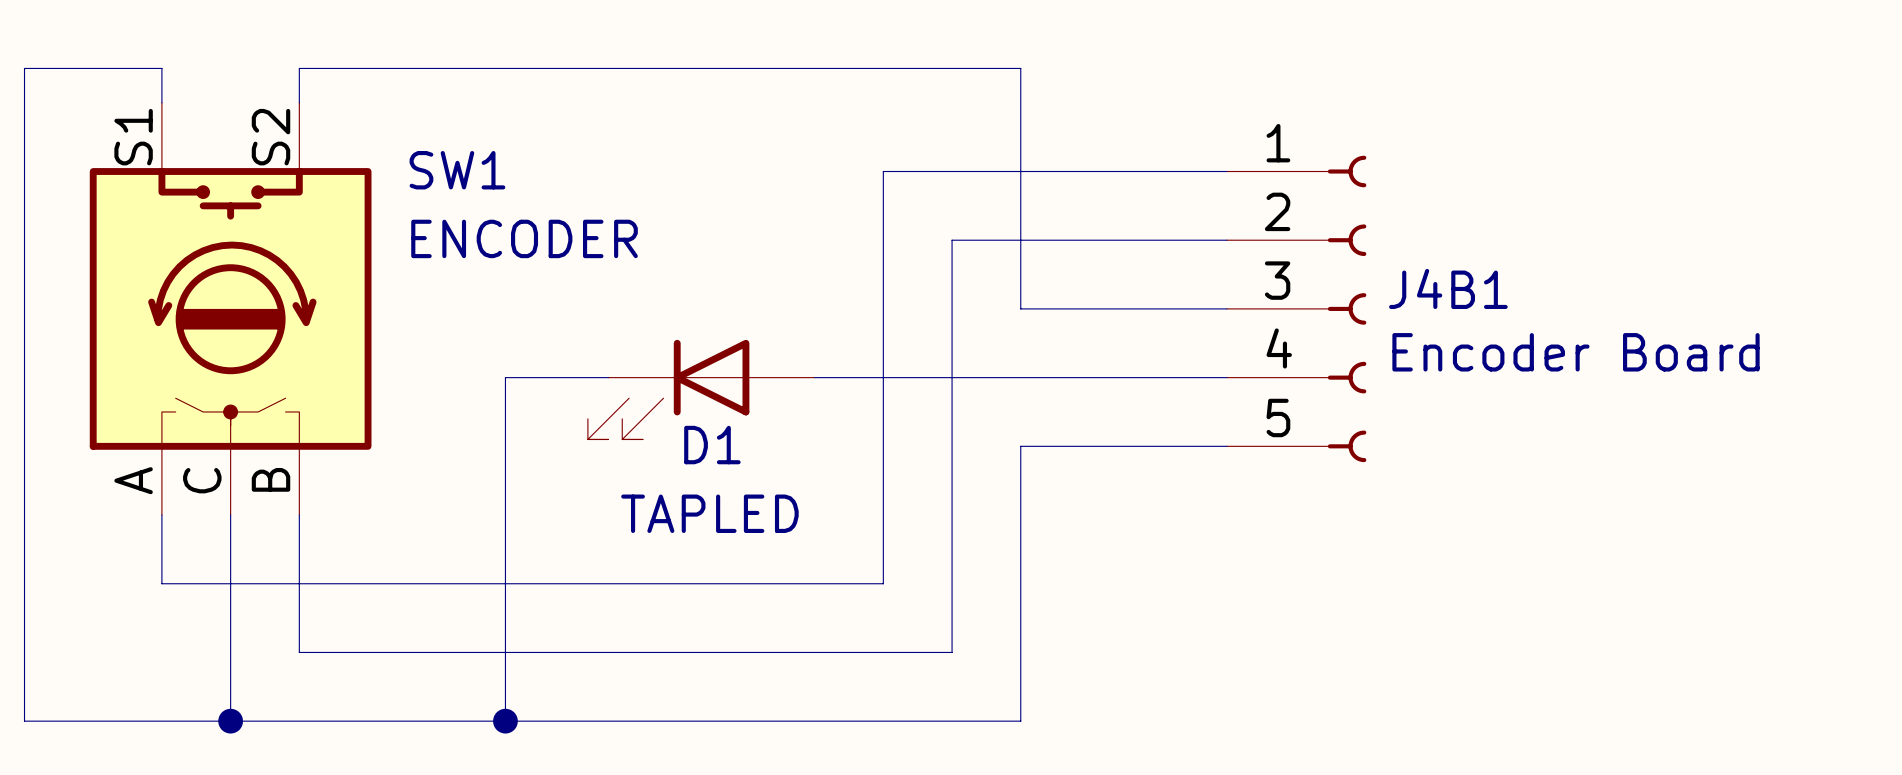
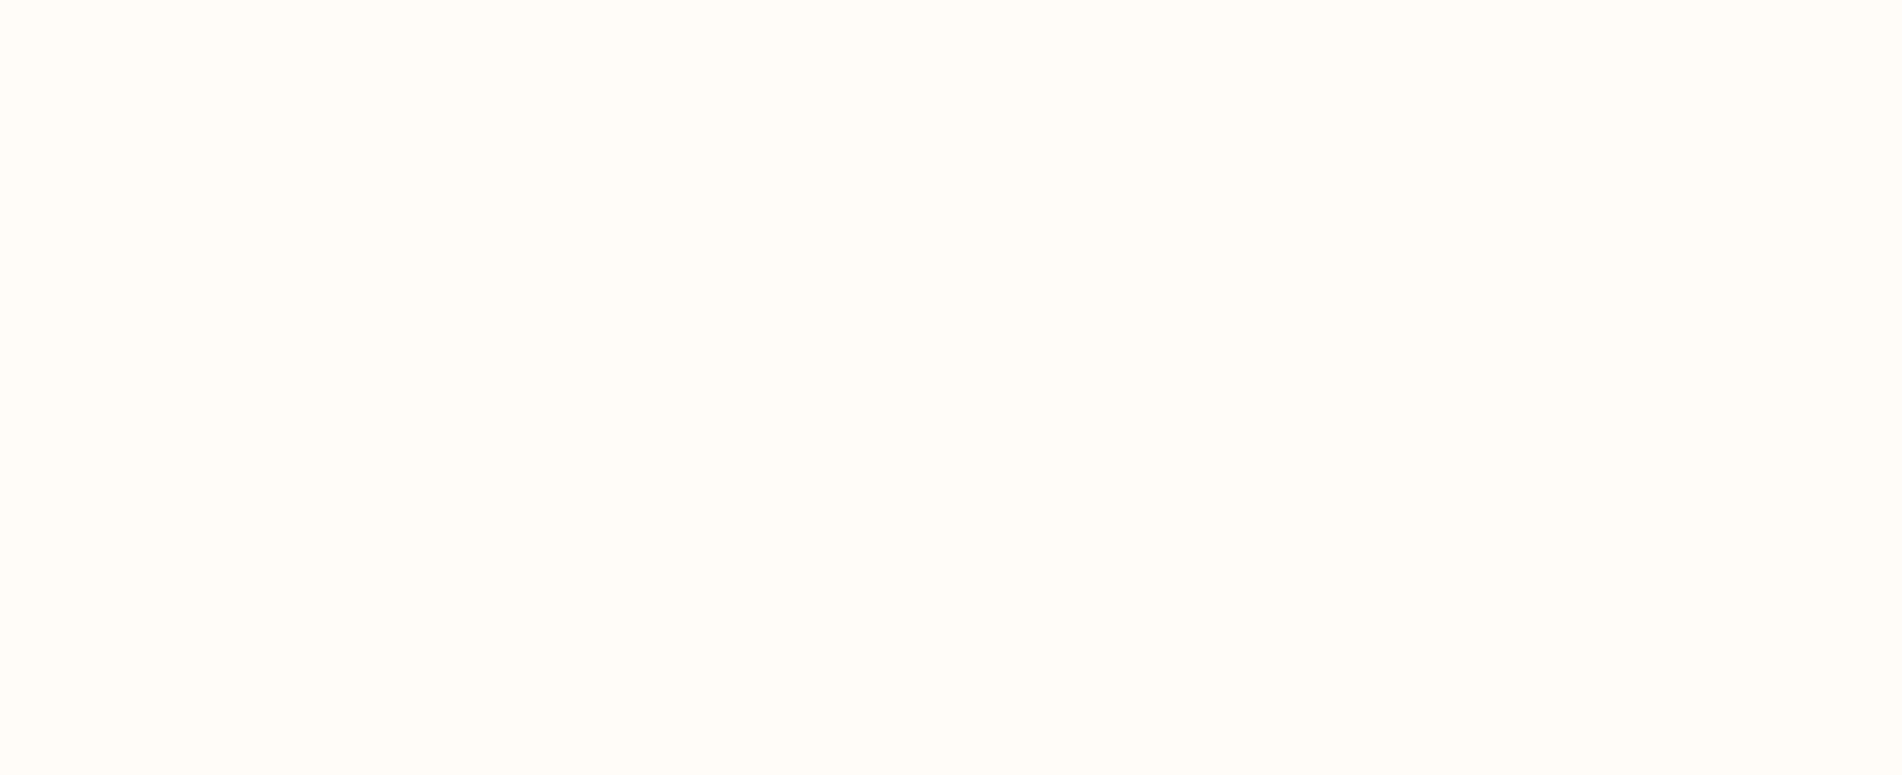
wire: (161, 102) (161, 68) (24, 68) (24, 721) (1020, 721) (1020, 446) (1226, 446) -> none
wire: (299, 102) (299, 68) (1020, 68) (1020, 308) (1226, 308) -> none
wire: (1226, 171) (883, 171) (883, 583) (161, 583) (161, 515) -> none
wire: (1226, 240) (952, 240) (952, 652) (299, 652) (299, 515) -> none
SW1: ENCODER (230, 308) -> none
J4B1: Encoder Board (1296, 308) -> none
wire: (608, 377) (505, 377) (505, 721) -> none
wire: (814, 377) (1226, 377) -> none
D1: TAPLED (701, 389) -> none
wire: (230, 515) (230, 721) -> none
junction: (230, 721) -> none
junction: (505, 721) -> none

